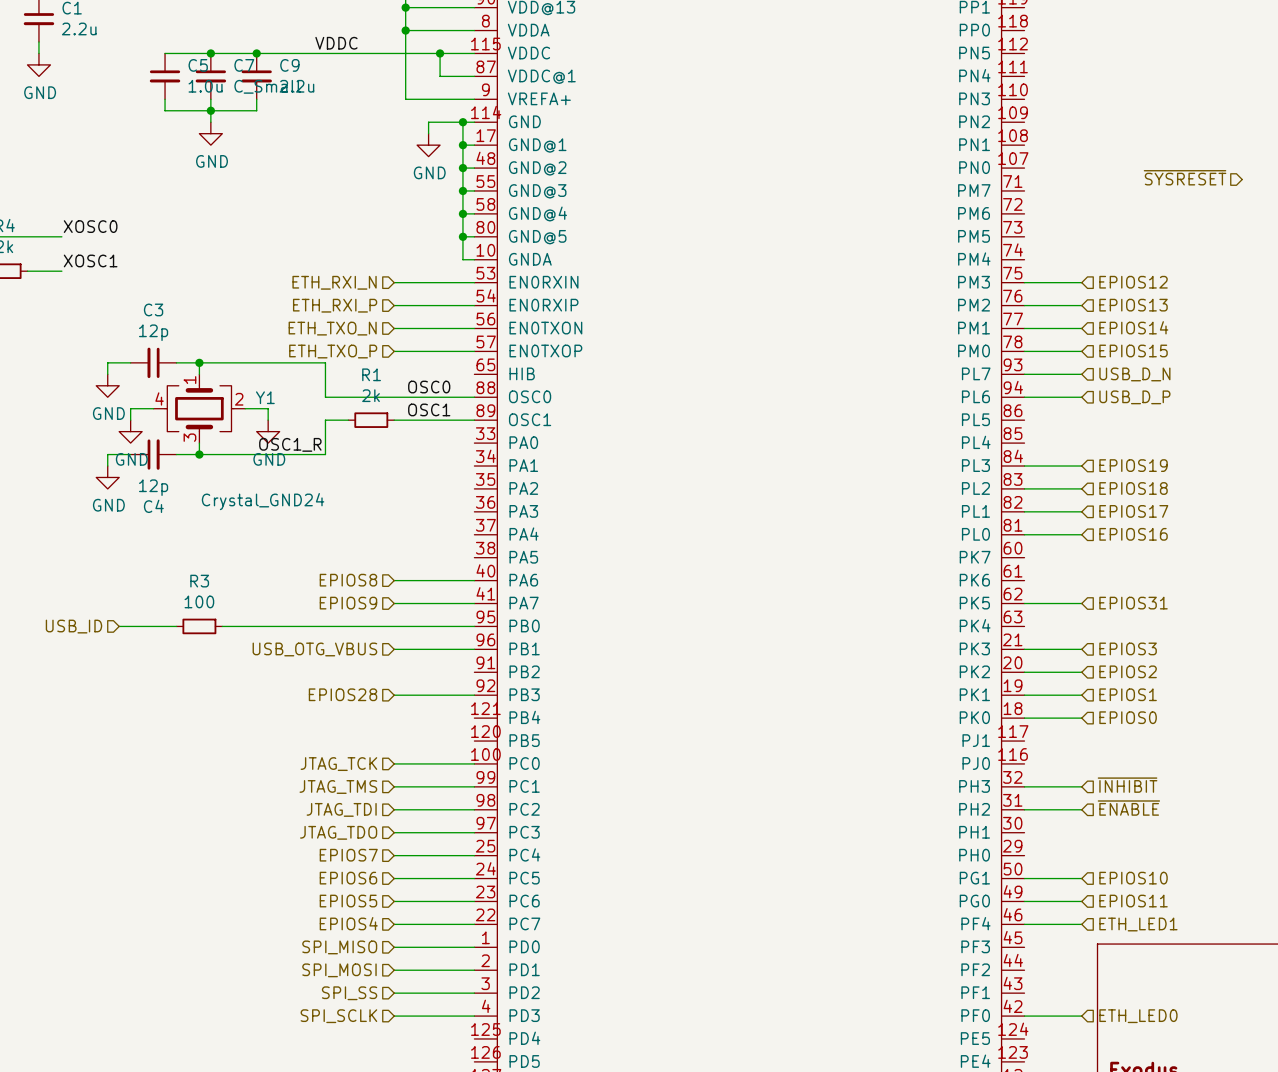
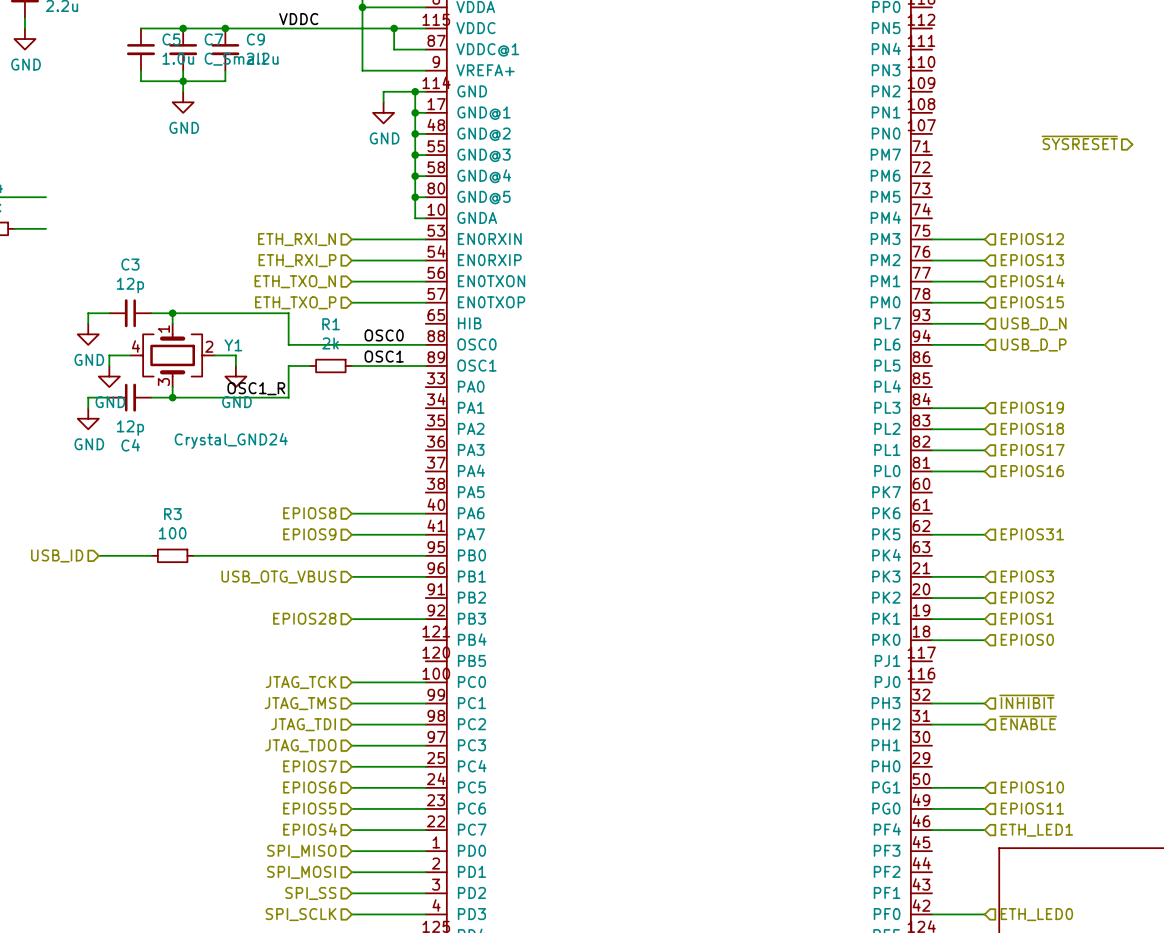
label: XOSC0 (90, 226) -> none
label: XOSC1 (90, 260) -> none

